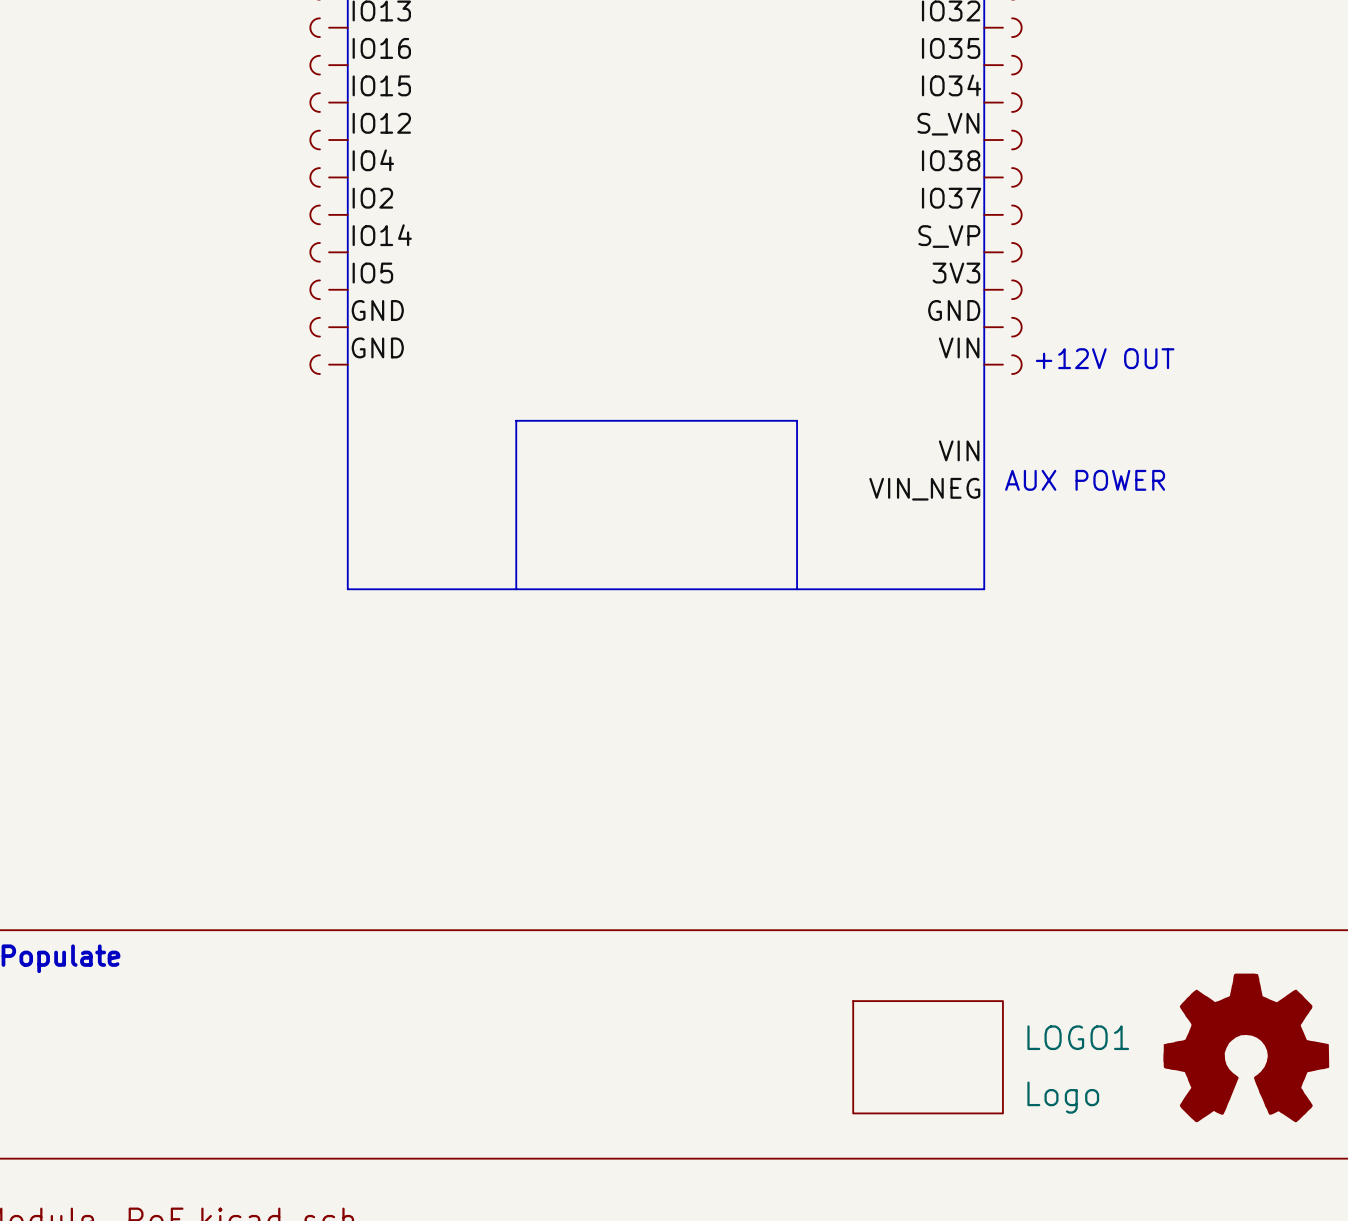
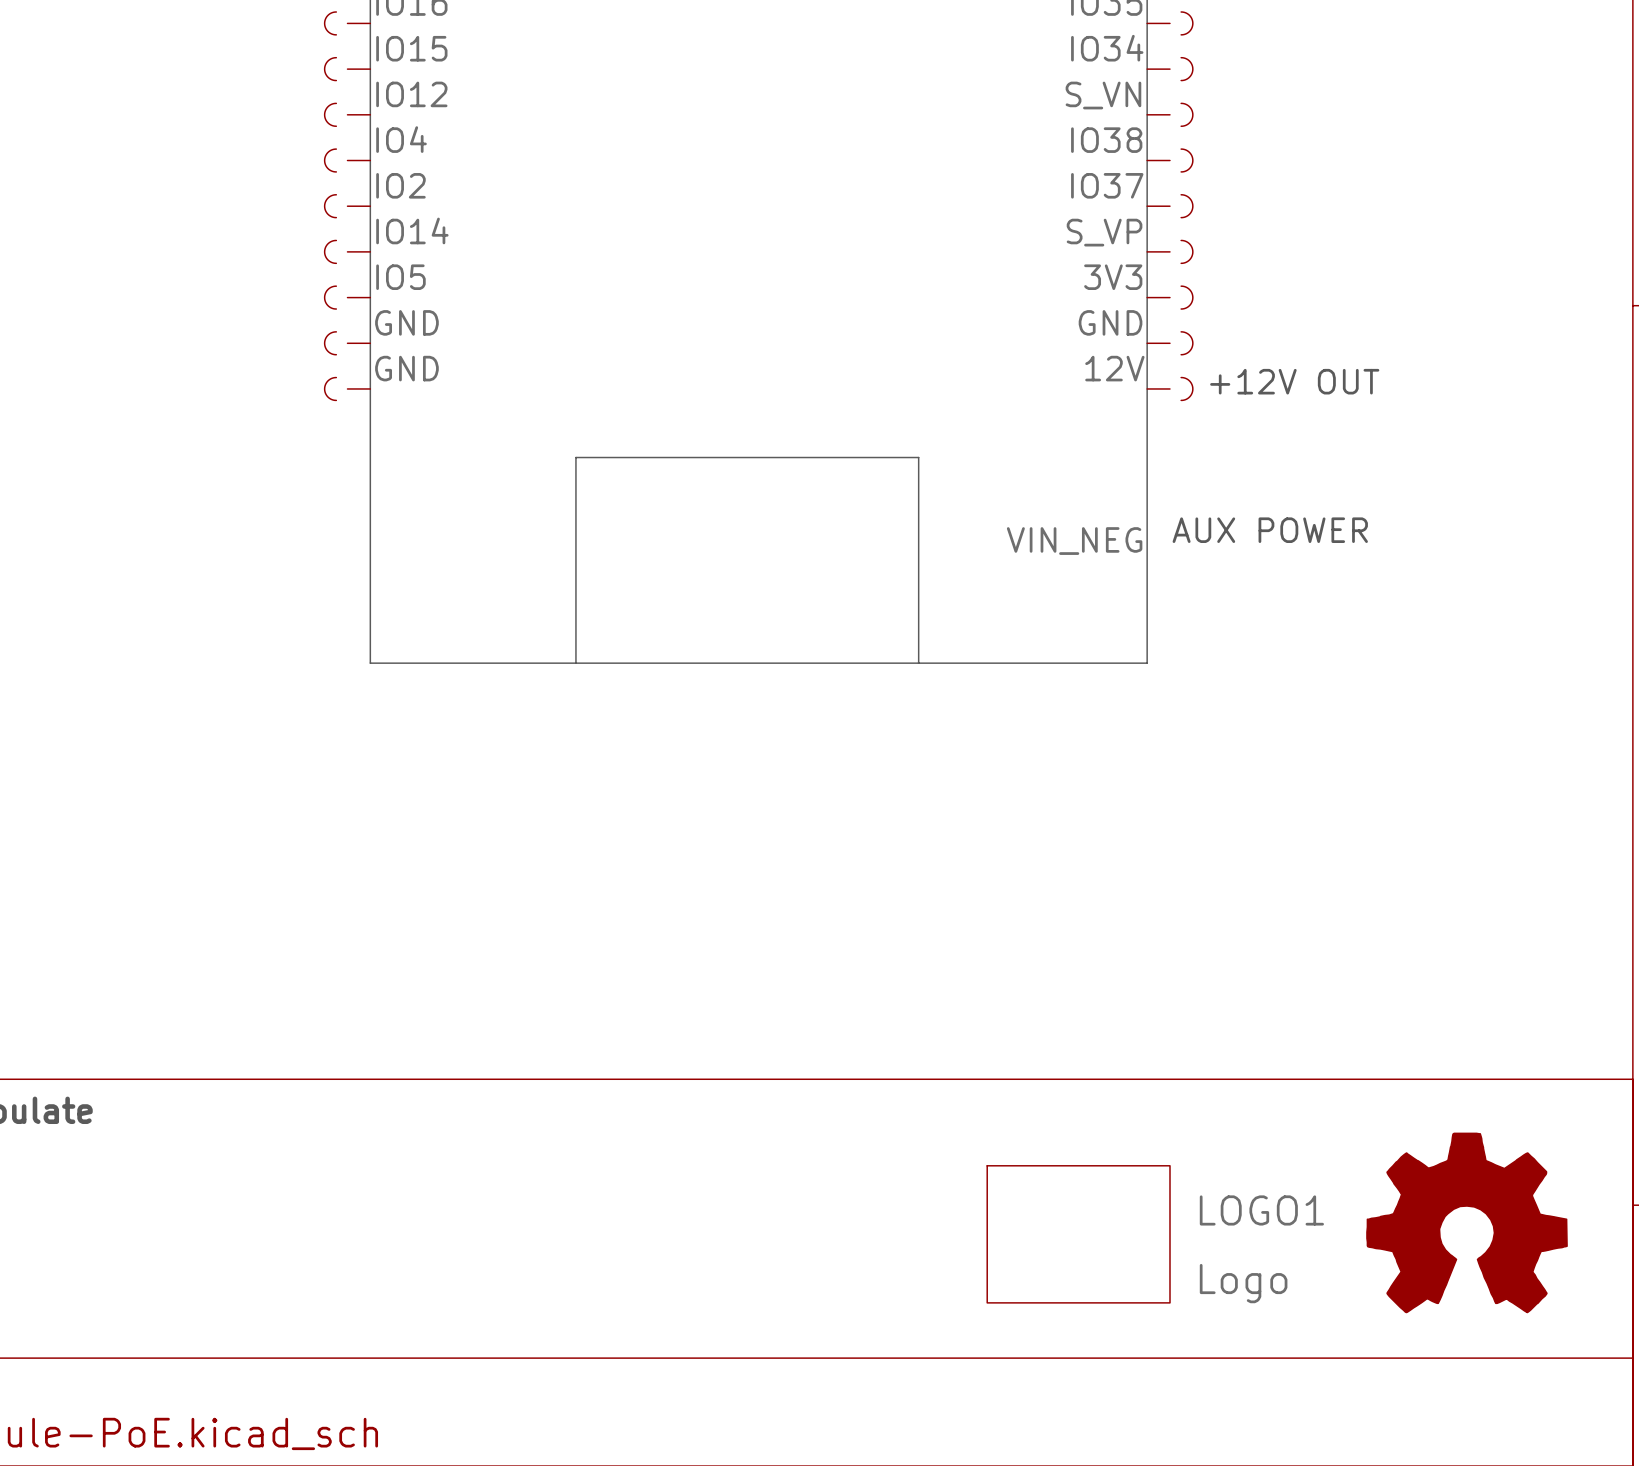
label: VIN (959, 347) -> 12V (1114, 368)
label: VIN (959, 450) -> none

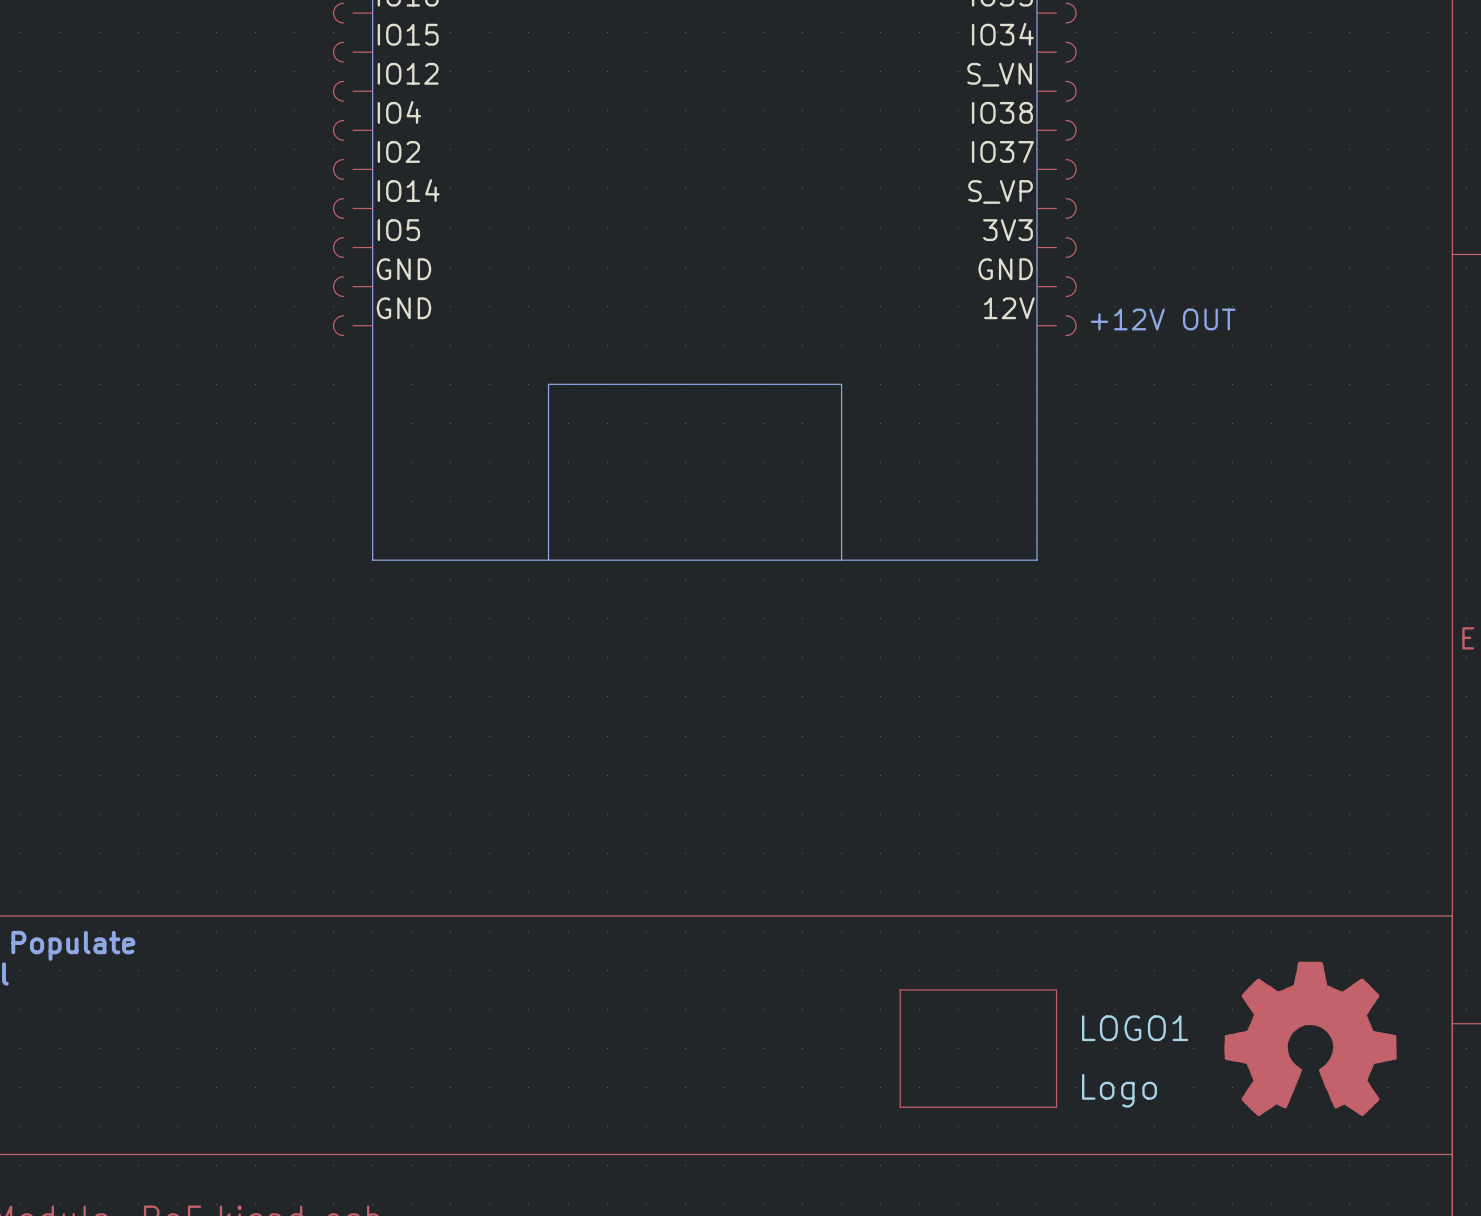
text: AUX POWER (1270, 530) -> none
label: VIN_NEG (1074, 541) -> none

